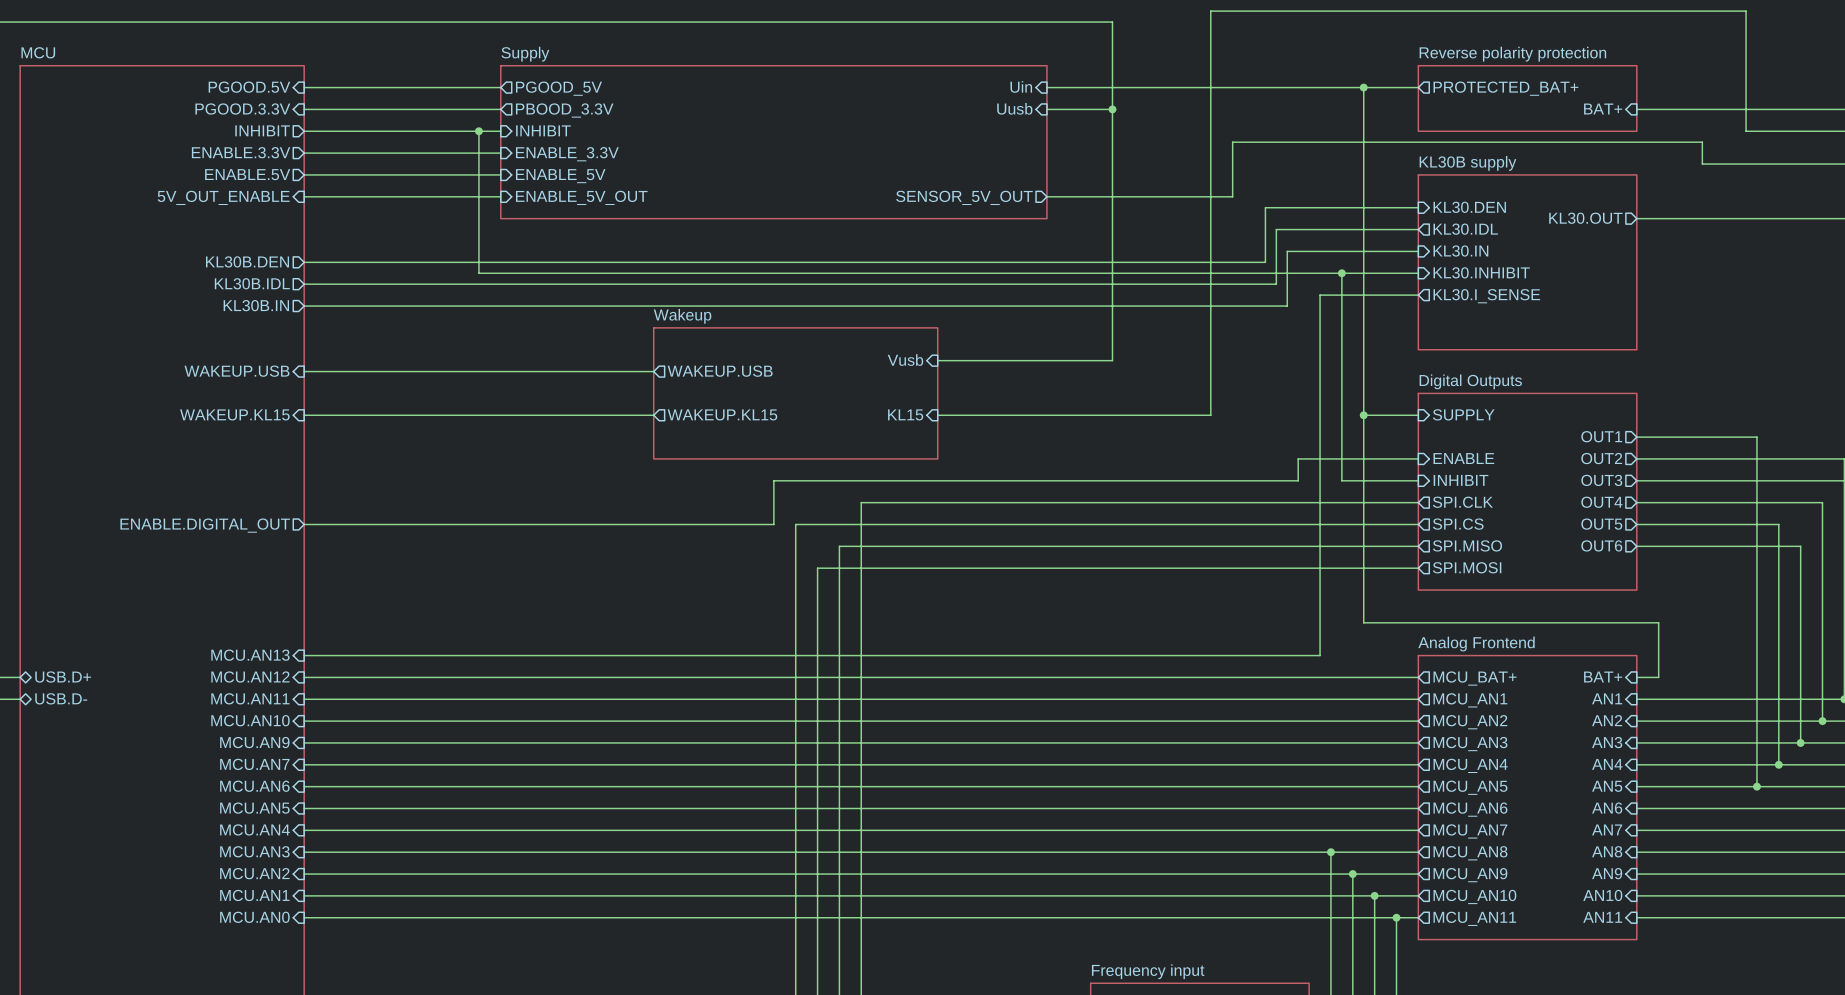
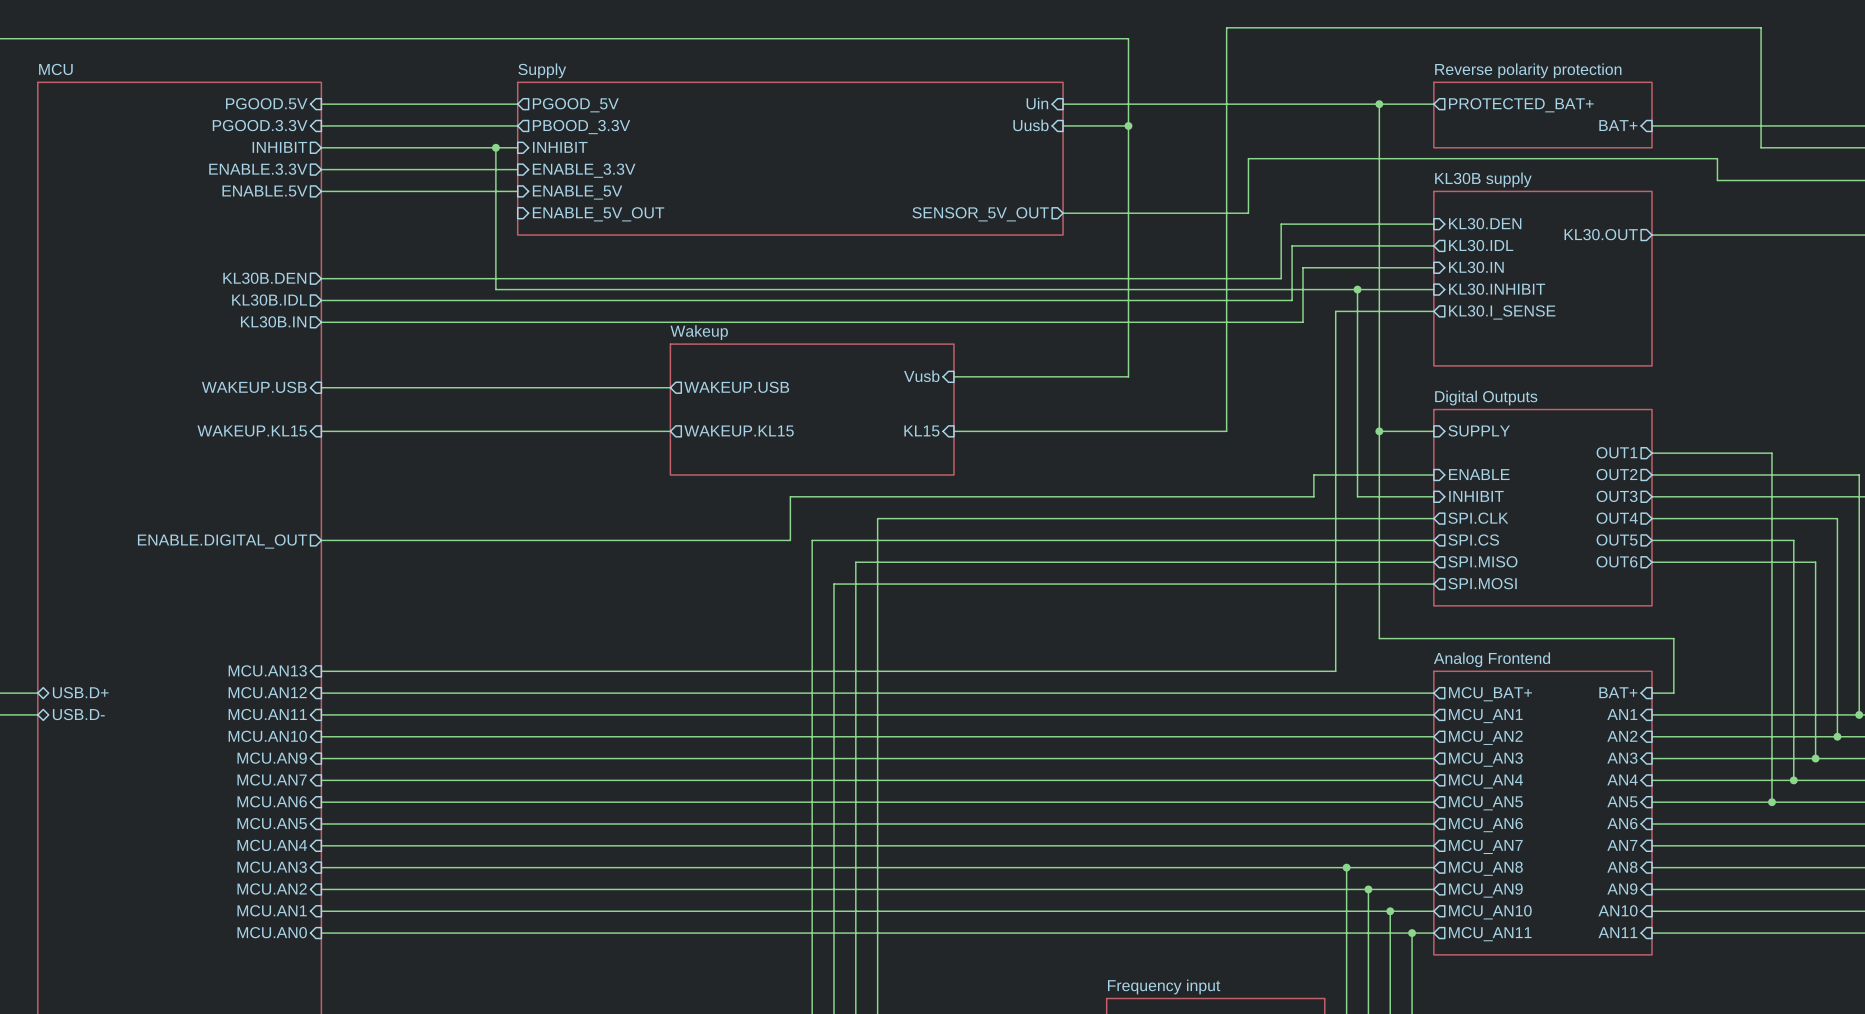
wire: (304, 196) (500, 196) -> none
sheet pin: 5V_OUT_ENABLE (223, 197) -> none

